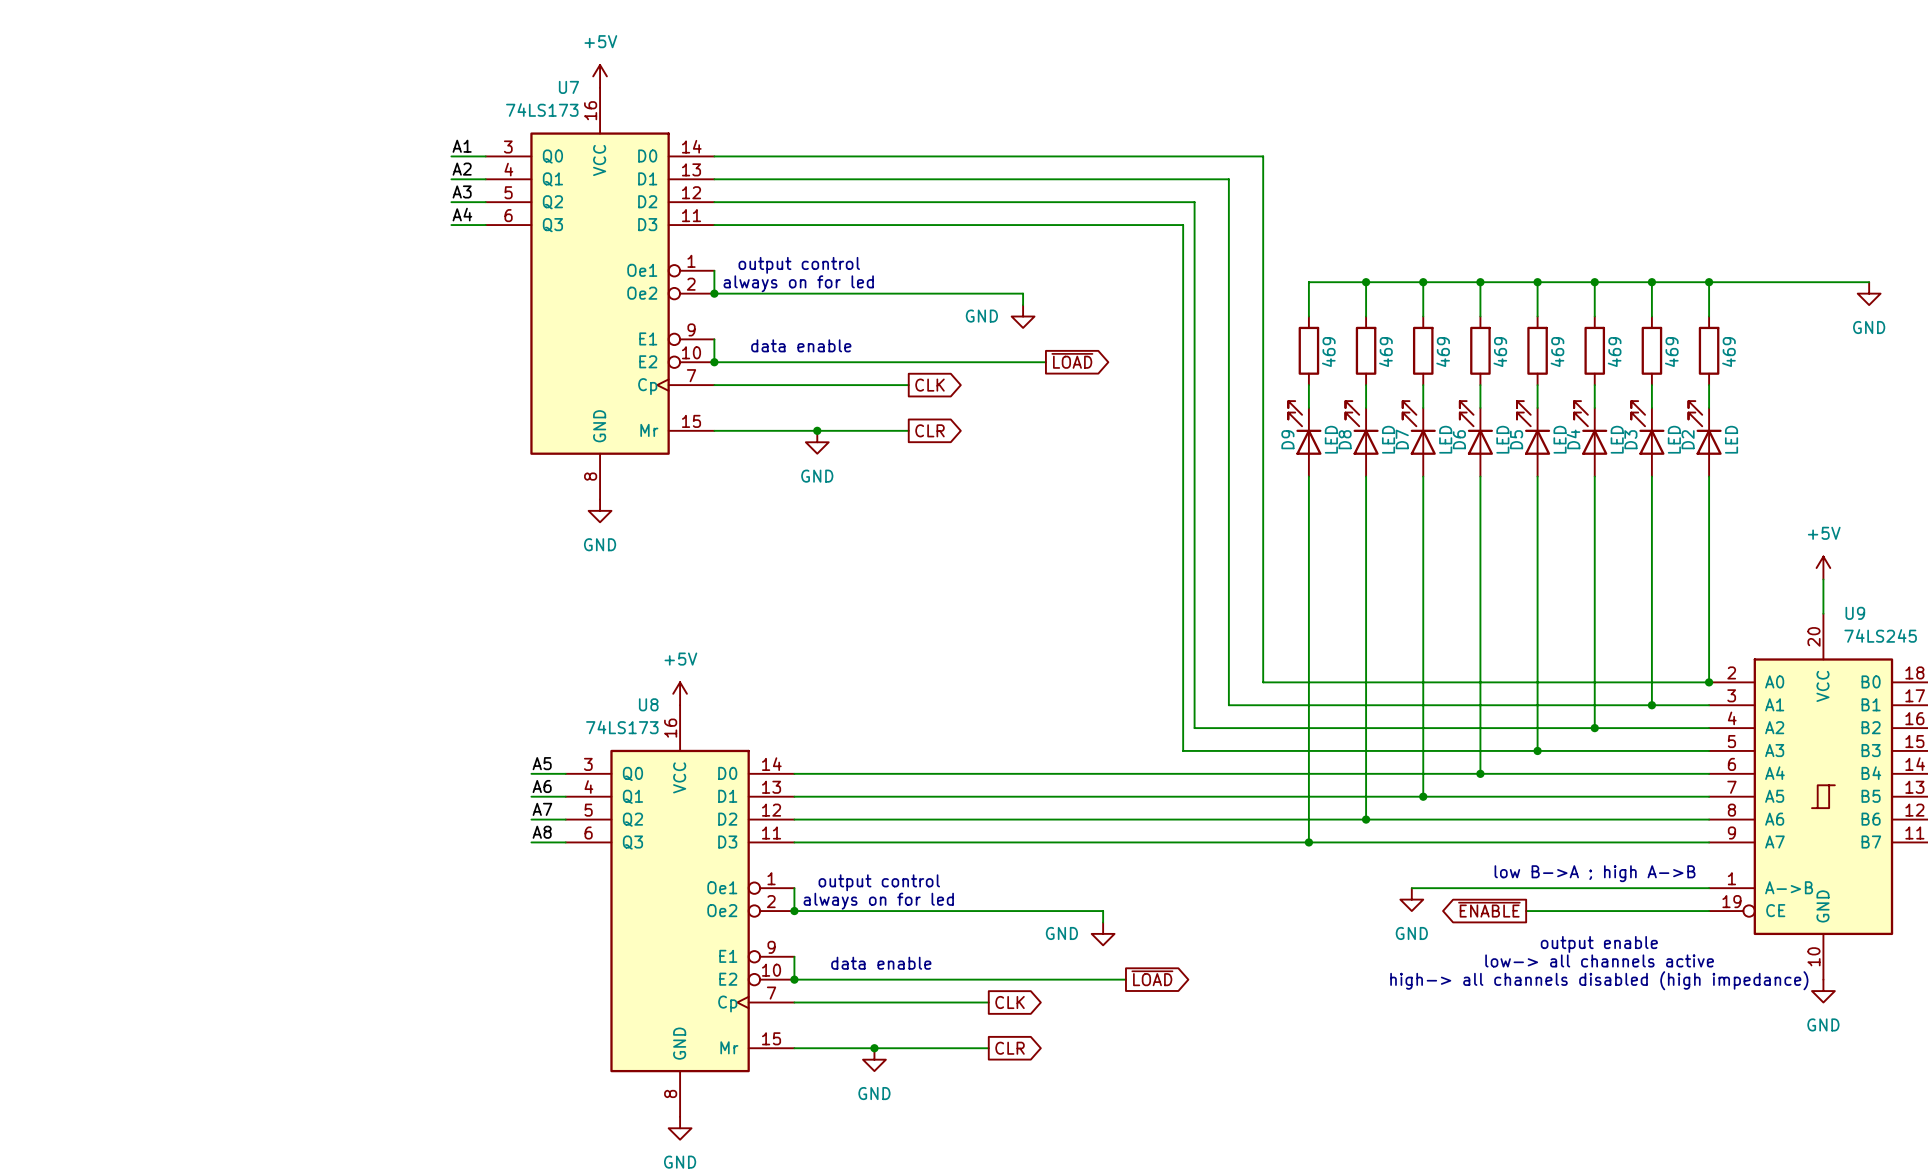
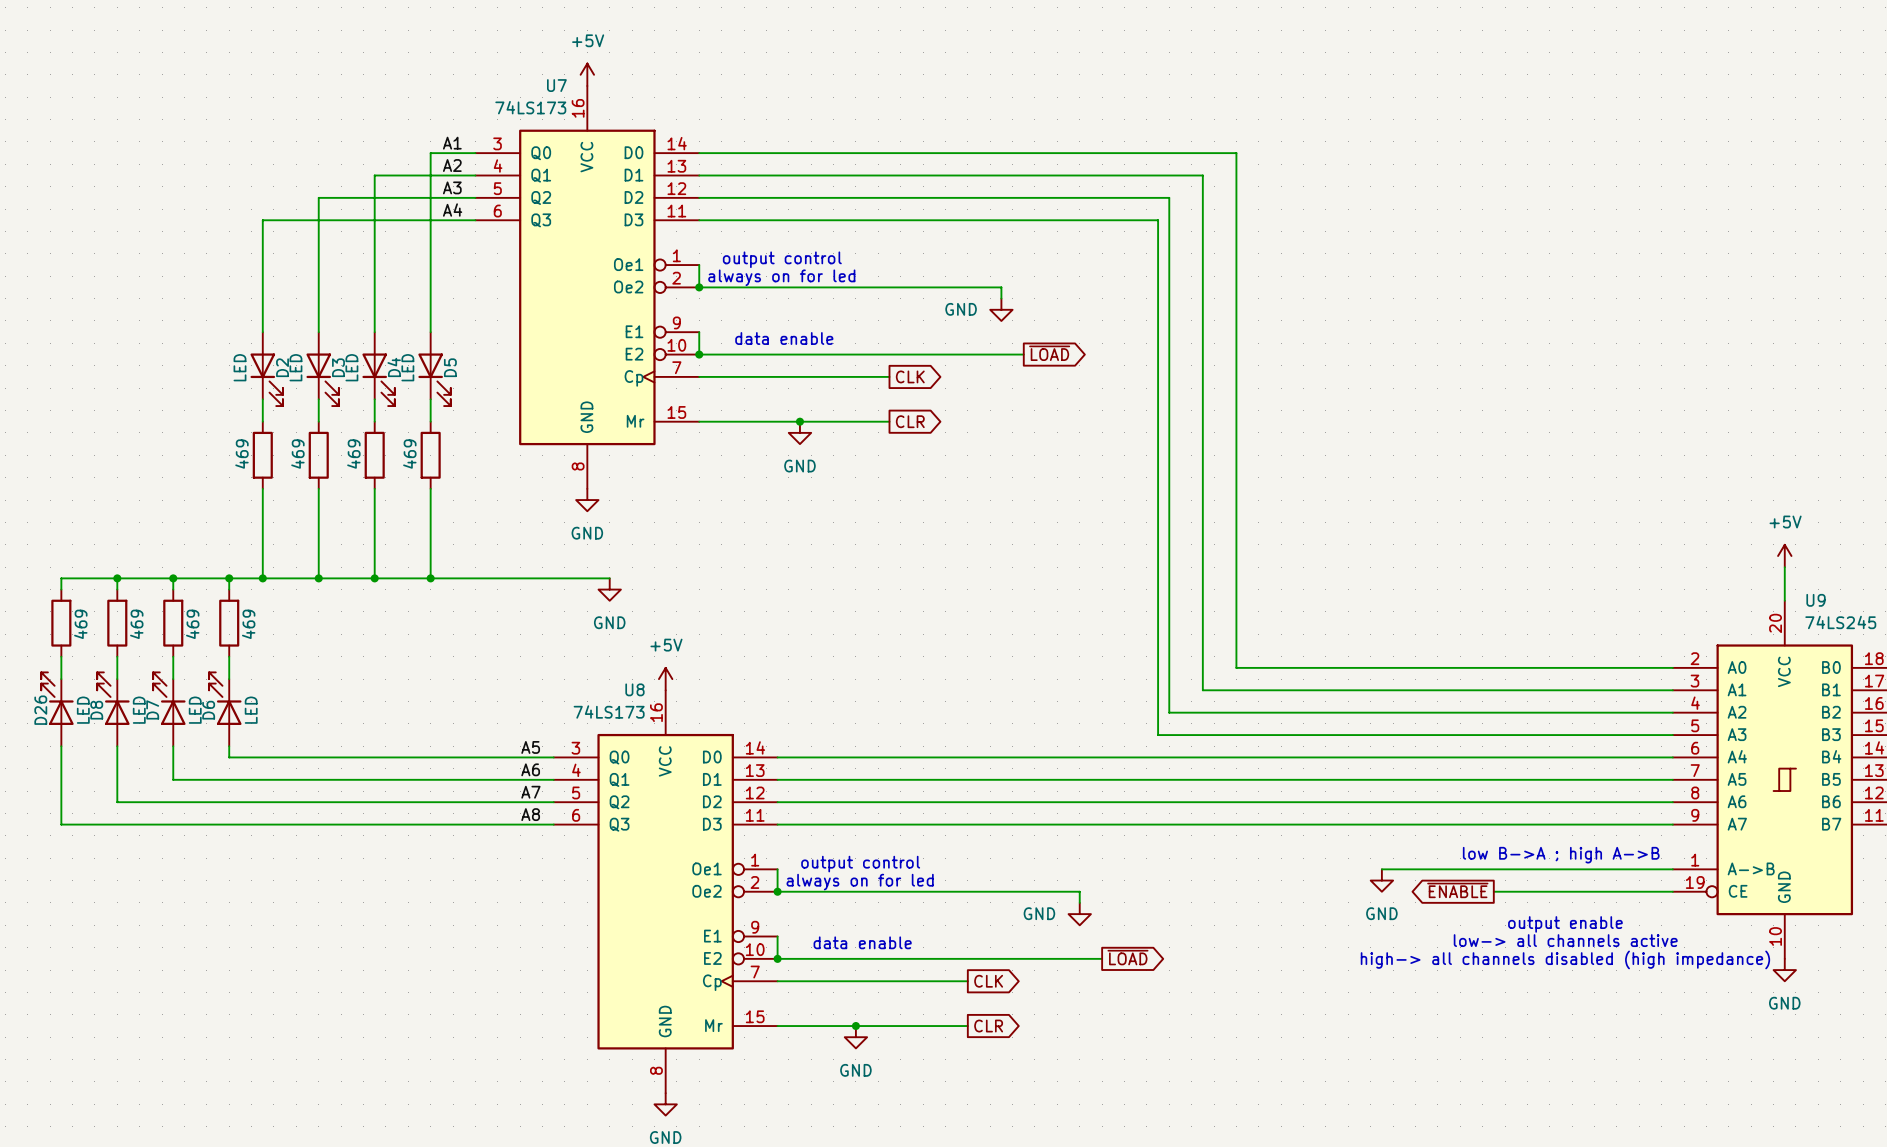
wire: none -> (441, 153) (430, 153) (430, 332)
wire: none -> (441, 175) (374, 175) (374, 332)
wire: none -> (441, 197) (318, 197) (318, 332)
wire: none -> (441, 220) (262, 220) (262, 332)
wire: (1366, 282) (1366, 316) -> none
junction: (1366, 282) -> none
wire: (1423, 282) (1423, 316) -> none
junction: (1423, 282) -> none
wire: (1480, 282) (1480, 316) -> none
junction: (1480, 282) -> none
wire: (1537, 282) (1537, 316) -> none
junction: (1537, 282) -> none
wire: (1594, 282) (1594, 316) -> none
junction: (1594, 282) -> none
wire: (1651, 282) (1651, 316) -> none
junction: (1651, 282) -> none
wire: (1709, 282) (1709, 316) -> none
junction: (1709, 282) -> none
wire: (1869, 282) (1308, 282) (1308, 316) -> none
power symbol: GND (1869, 293) -> none
part: 469 (1308, 350) -> none
part: 469 (1366, 350) -> none
part: 469 (1423, 350) -> none
part: 469 (1480, 350) -> none
part: 469 (1537, 350) -> none
part: 469 (1594, 350) -> none
part: 469 (1651, 350) -> none
part: 469 (1709, 350) -> none
wire: (1308, 385) (1308, 407) -> none
wire: (1366, 385) (1366, 407) -> none
wire: (1423, 385) (1423, 407) -> none
wire: (1480, 385) (1480, 407) -> none
wire: (1537, 385) (1537, 407) -> none
wire: (1594, 385) (1594, 407) -> none
wire: (1651, 385) (1651, 407) -> none
wire: (1709, 385) (1709, 407) -> none
wire: none -> (262, 399) (262, 421)
wire: none -> (318, 399) (318, 421)
wire: none -> (374, 399) (374, 421)
wire: none -> (430, 399) (430, 421)
D5 rotation: 0° (1533, 427) -> 180° (434, 379)
D4 rotation: 0° (1590, 427) -> 180° (378, 379)
D3 rotation: 0° (1647, 427) -> 180° (322, 379)
D2 rotation: 0° (1705, 427) -> 180° (266, 379)
D9: LED (1304, 438) -> none
D8 position: (1362, 438) -> (113, 709)
D7 position: (1419, 438) -> (169, 709)
D6 position: (1476, 438) -> (225, 709)
D5 position: (1533, 438) -> (434, 369)
D4 position: (1590, 438) -> (378, 369)
D3 position: (1647, 438) -> (322, 369)
D2 position: (1705, 438) -> (266, 369)
part: none -> 469 (262, 455)
part: none -> 469 (318, 455)
part: none -> 469 (374, 455)
part: none -> 469 (430, 455)
wire: (1308, 476) (1308, 842) -> none
wire: (1366, 476) (1366, 819) -> none
wire: (1423, 476) (1423, 796) -> none
wire: (1480, 476) (1480, 773) -> none
wire: (1537, 476) (1537, 750) -> none
wire: (1594, 476) (1594, 728) -> none
wire: (1651, 476) (1651, 705) -> none
wire: (1709, 476) (1709, 682) -> none
wire: none -> (262, 488) (262, 578)
wire: none -> (318, 488) (318, 578)
wire: none -> (374, 488) (374, 578)
wire: none -> (430, 488) (430, 578)
wire: none -> (117, 578) (117, 589)
junction: none -> (117, 578)
wire: none -> (173, 578) (173, 589)
junction: none -> (173, 578)
wire: none -> (229, 578) (229, 589)
junction: none -> (229, 578)
junction: none -> (262, 578)
junction: none -> (318, 578)
junction: none -> (374, 578)
junction: none -> (430, 578)
wire: none -> (609, 578) (61, 578) (61, 589)
power symbol: none -> GND (609, 589)
part: none -> 469 (61, 623)
part: none -> 469 (117, 623)
part: none -> 469 (173, 623)
part: none -> 469 (229, 623)
wire: none -> (61, 656) (61, 679)
wire: none -> (117, 656) (117, 679)
wire: none -> (173, 656) (173, 679)
wire: none -> (229, 656) (229, 679)
junction: (1709, 682) -> none
junction: (1651, 705) -> none
D26: none -> LED (57, 709)
junction: (1594, 728) -> none
junction: (1537, 750) -> none
wire: none -> (61, 746) (61, 824) (520, 824)
wire: none -> (117, 746) (117, 802) (520, 802)
wire: none -> (173, 746) (173, 779) (520, 779)
wire: none -> (229, 746) (229, 757) (520, 757)
junction: (1480, 773) -> none
junction: (1423, 796) -> none
junction: (1366, 819) -> none
junction: (1308, 842) -> none

